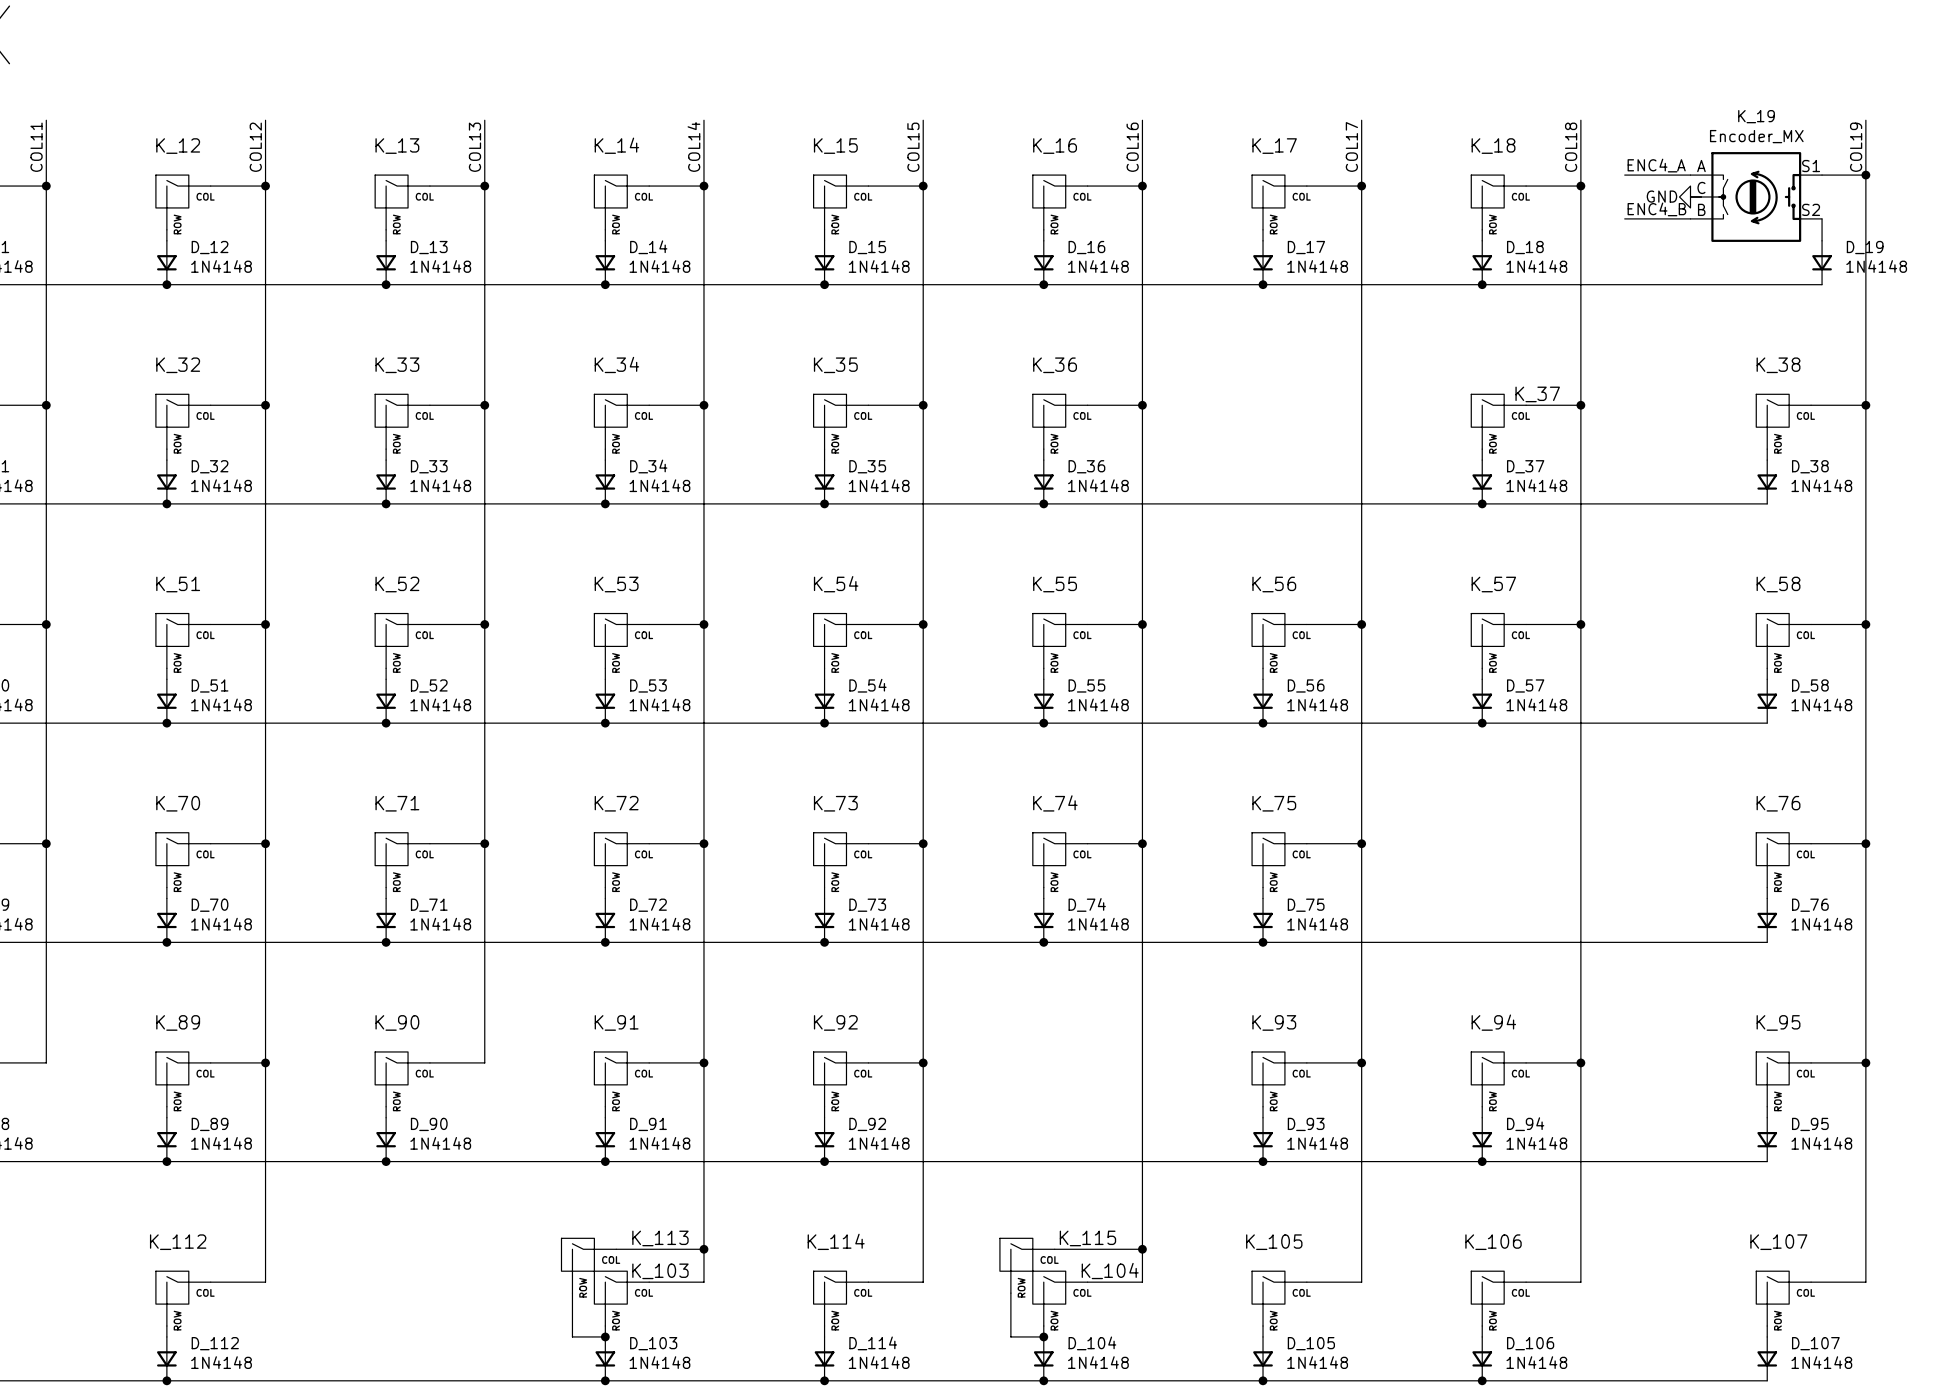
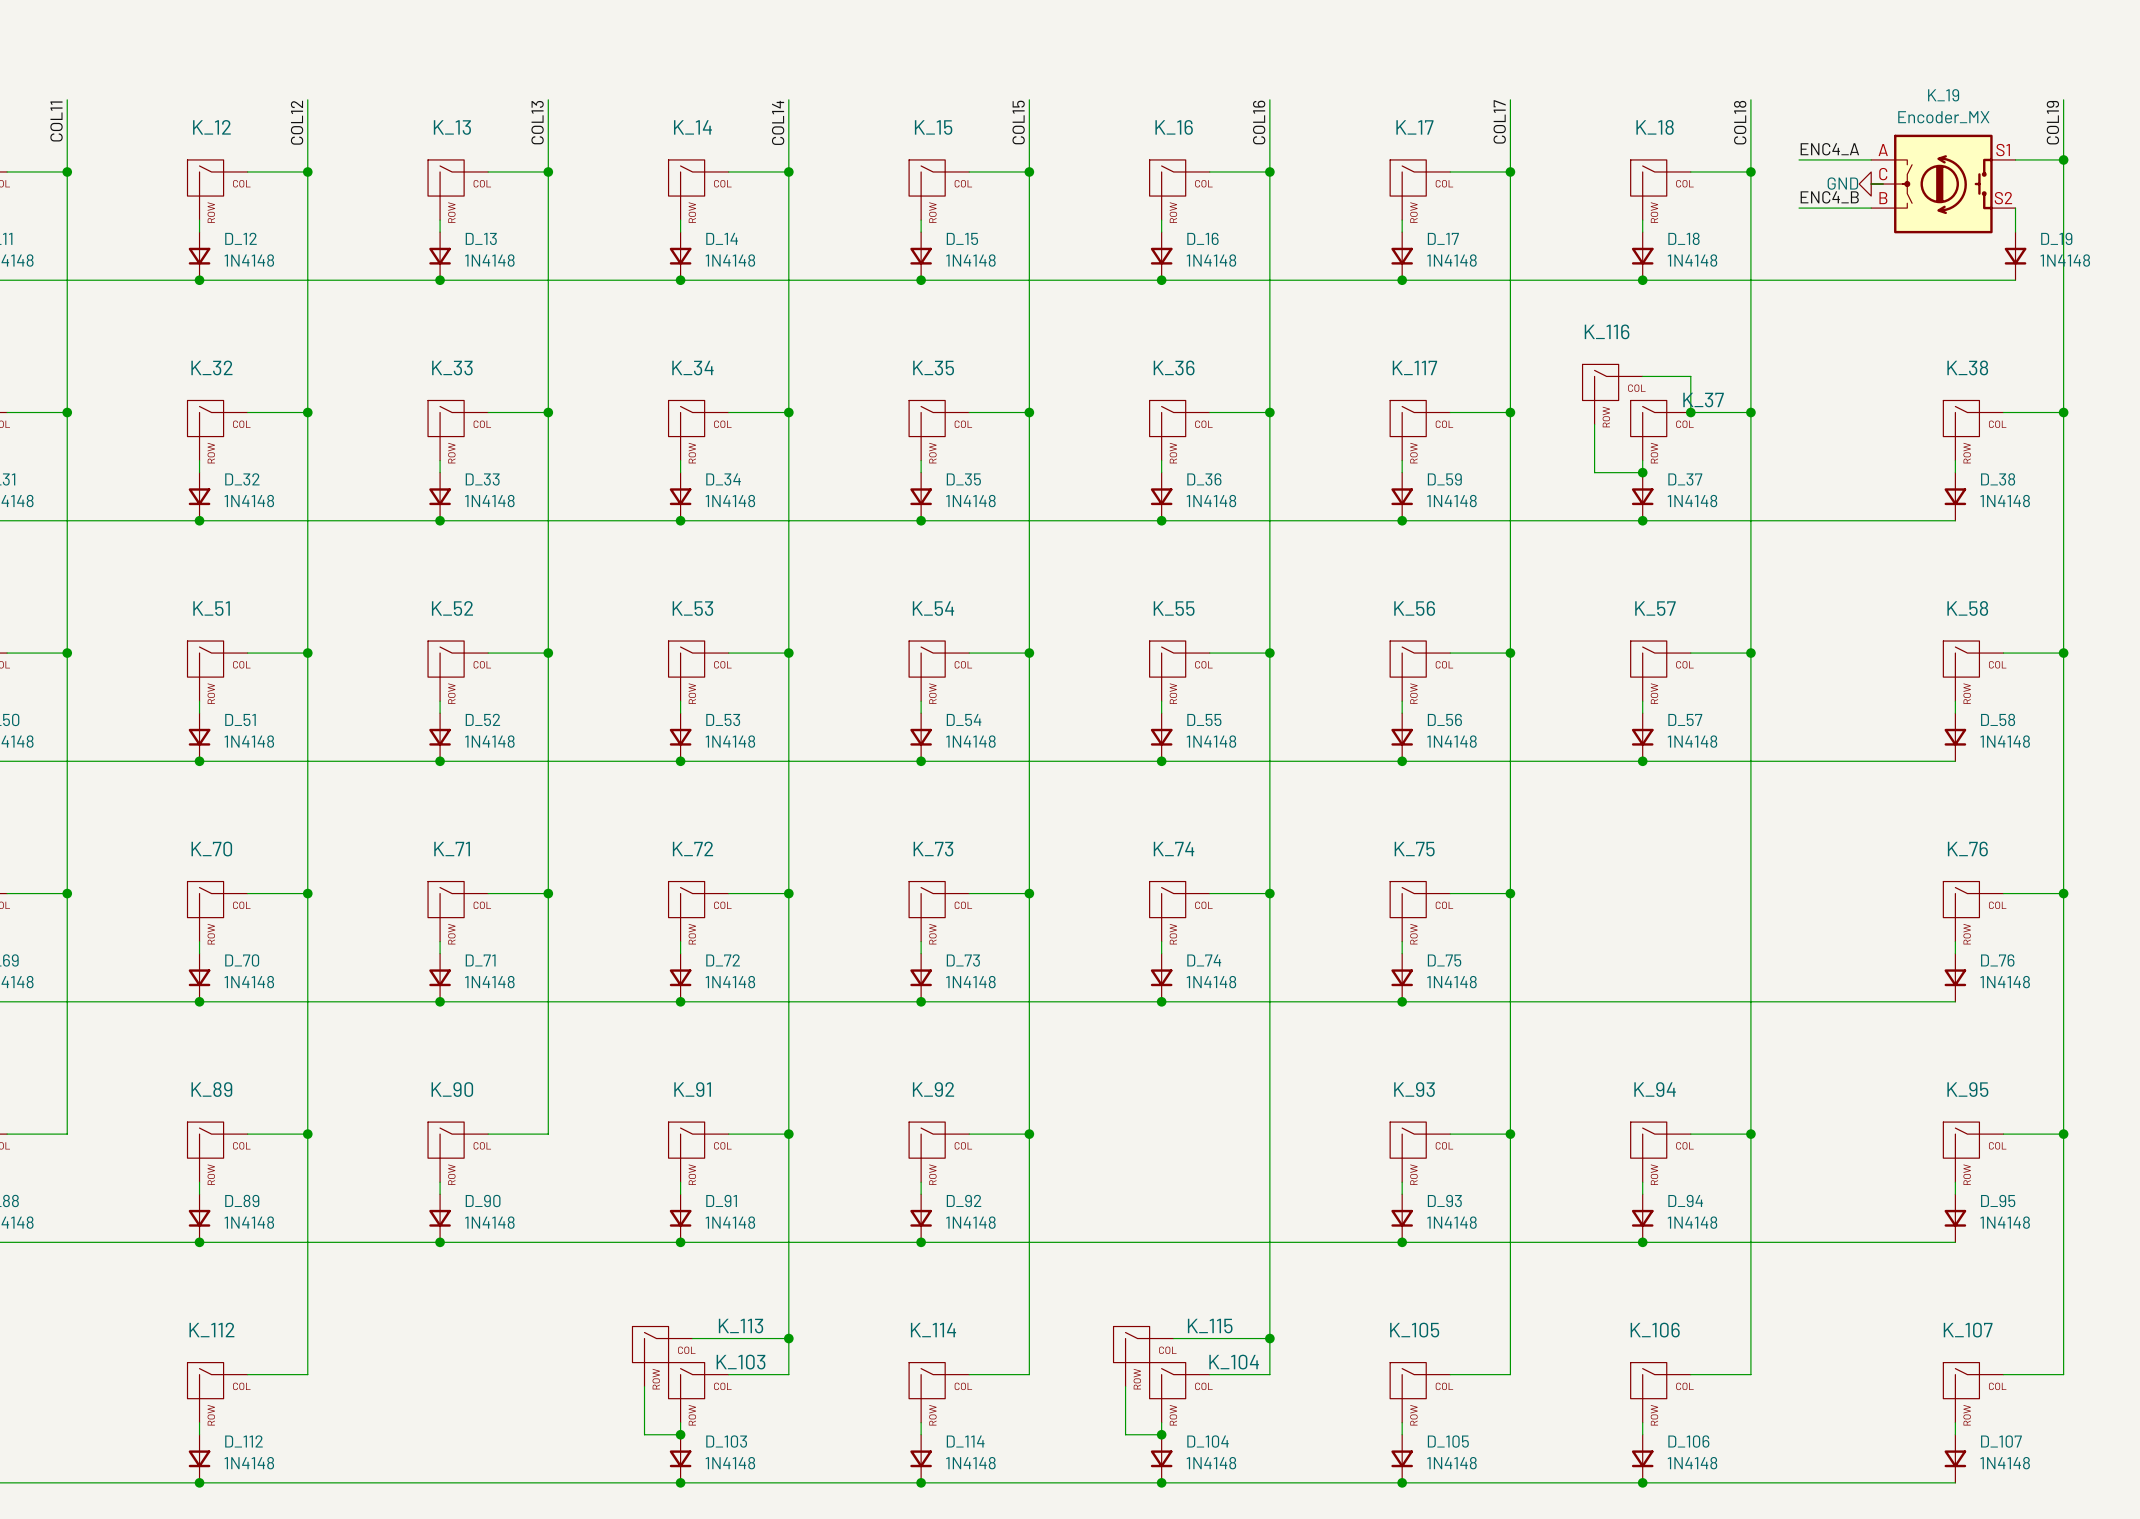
wire: none -> (1642, 376) (1690, 376) (1690, 412)
K_116: none -> (1612, 394)
wire: none -> (1450, 412) (1510, 412)
junction: none -> (1510, 412)
junction: none -> (1690, 412)
wire: none -> (1594, 424) (1594, 472) (1642, 472)
K_117: none -> (1420, 430)
wire: none -> (1402, 460) (1402, 472)
junction: none -> (1642, 472)
D_59: none -> 1N4148 (1402, 496)
junction: none -> (1402, 520)

